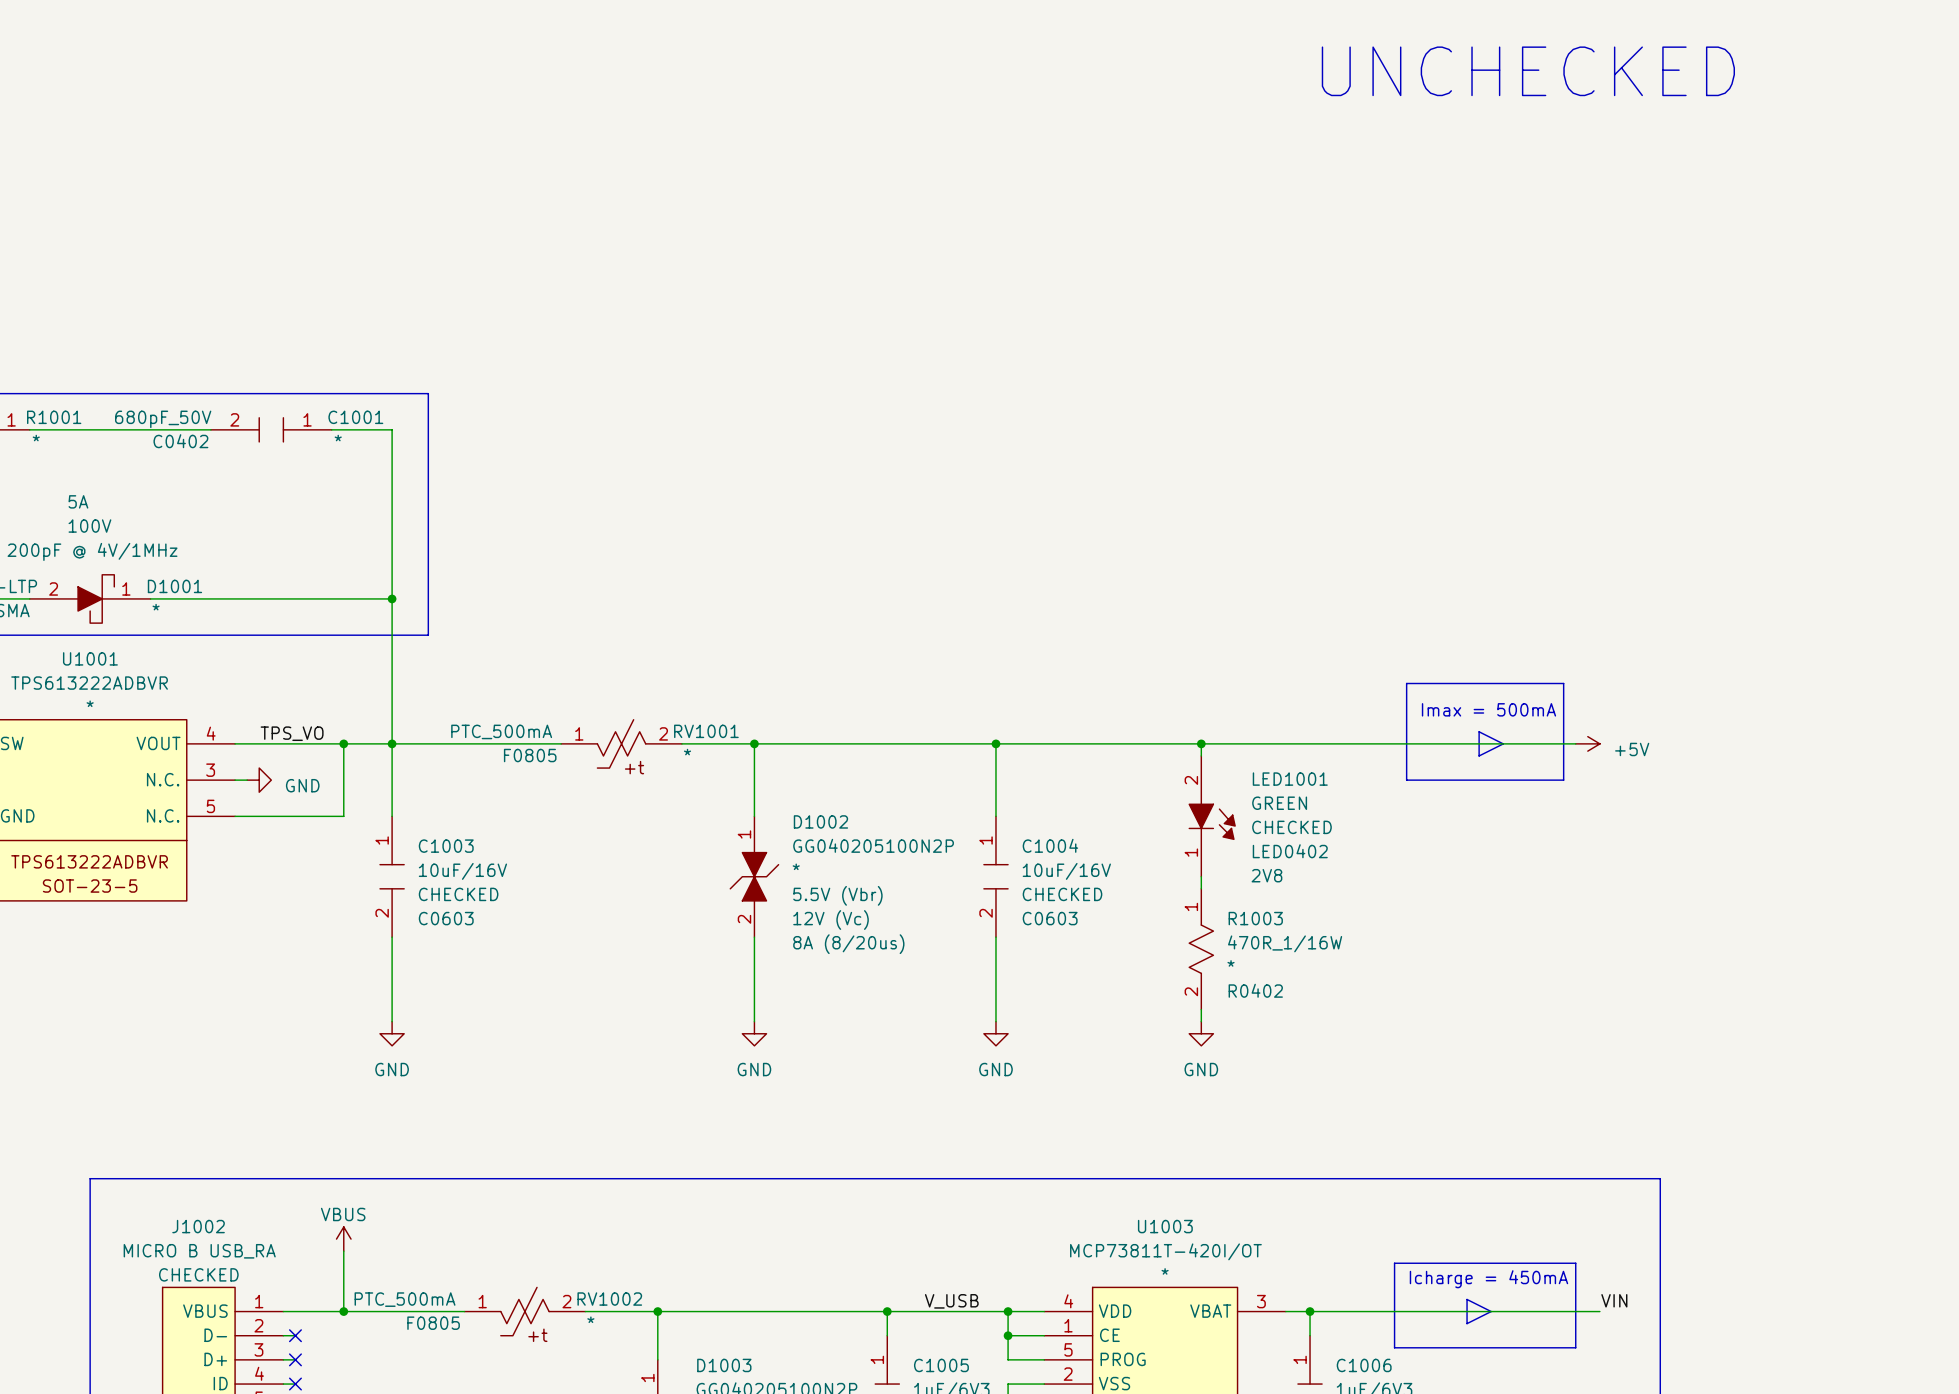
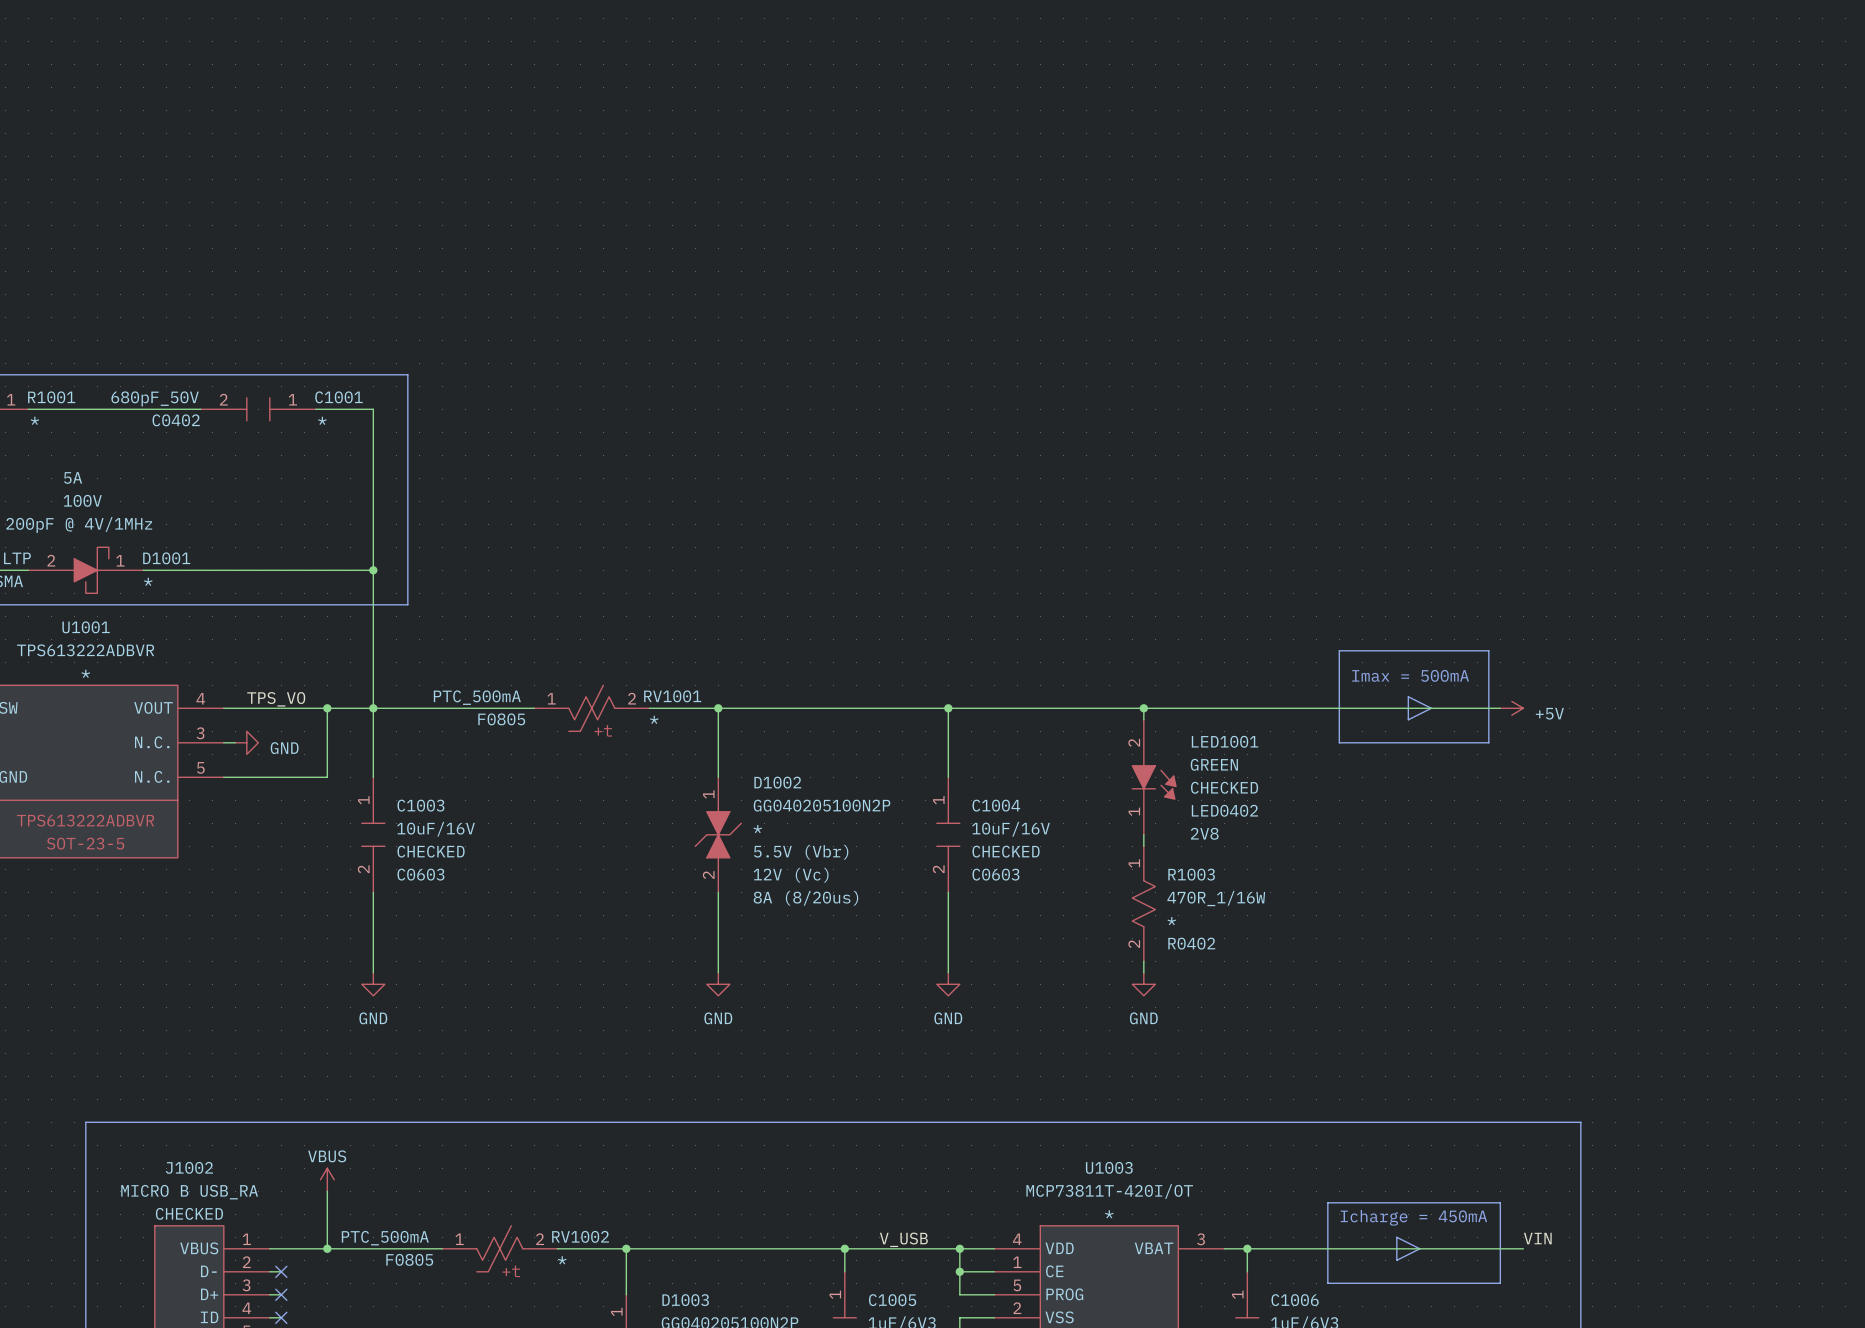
text: UNCHECKED (1528, 71) -> none

